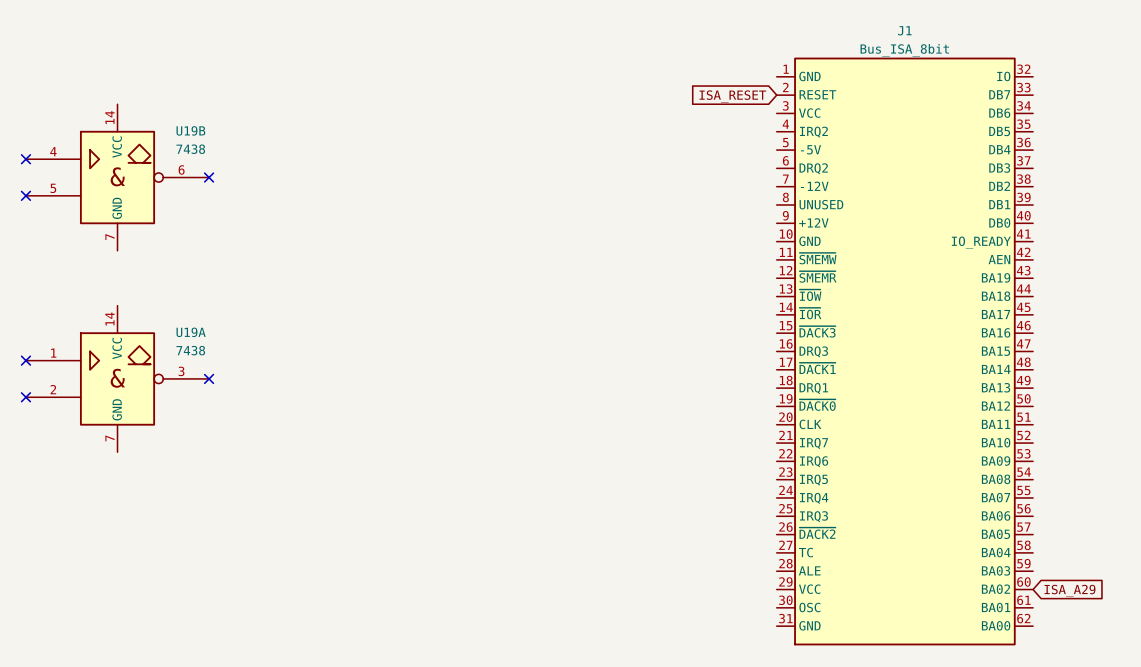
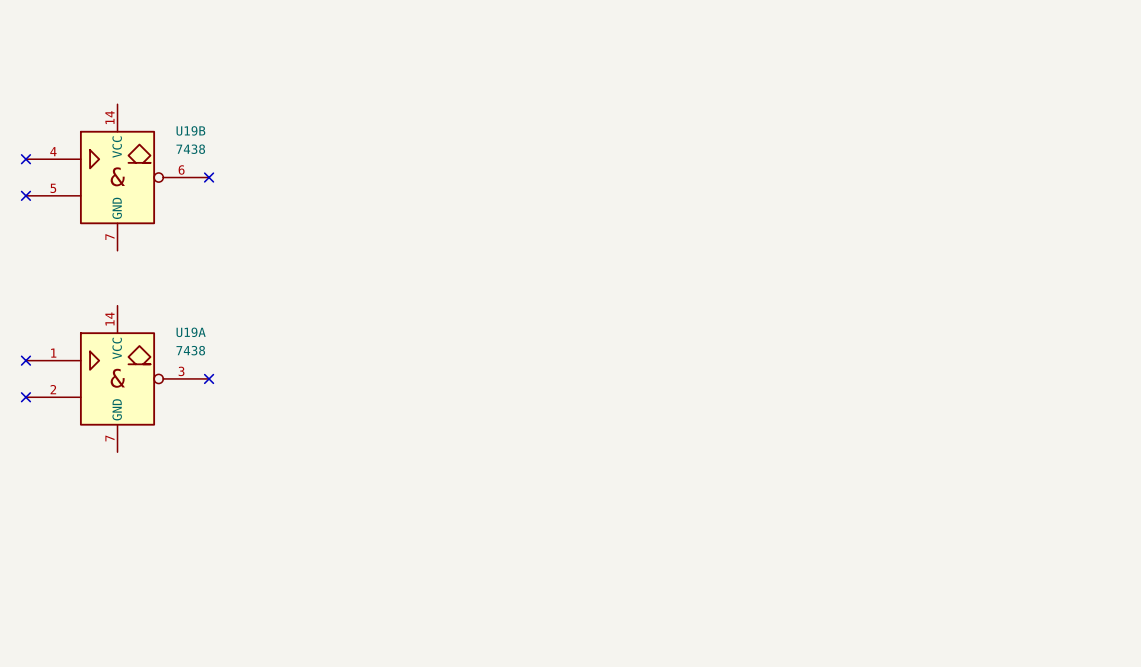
global label: ISA_RESET (732, 96) -> none
J1: Bus_ISA_8bit (904, 351) -> none
global label: ISA_A29 (1070, 590) -> none

